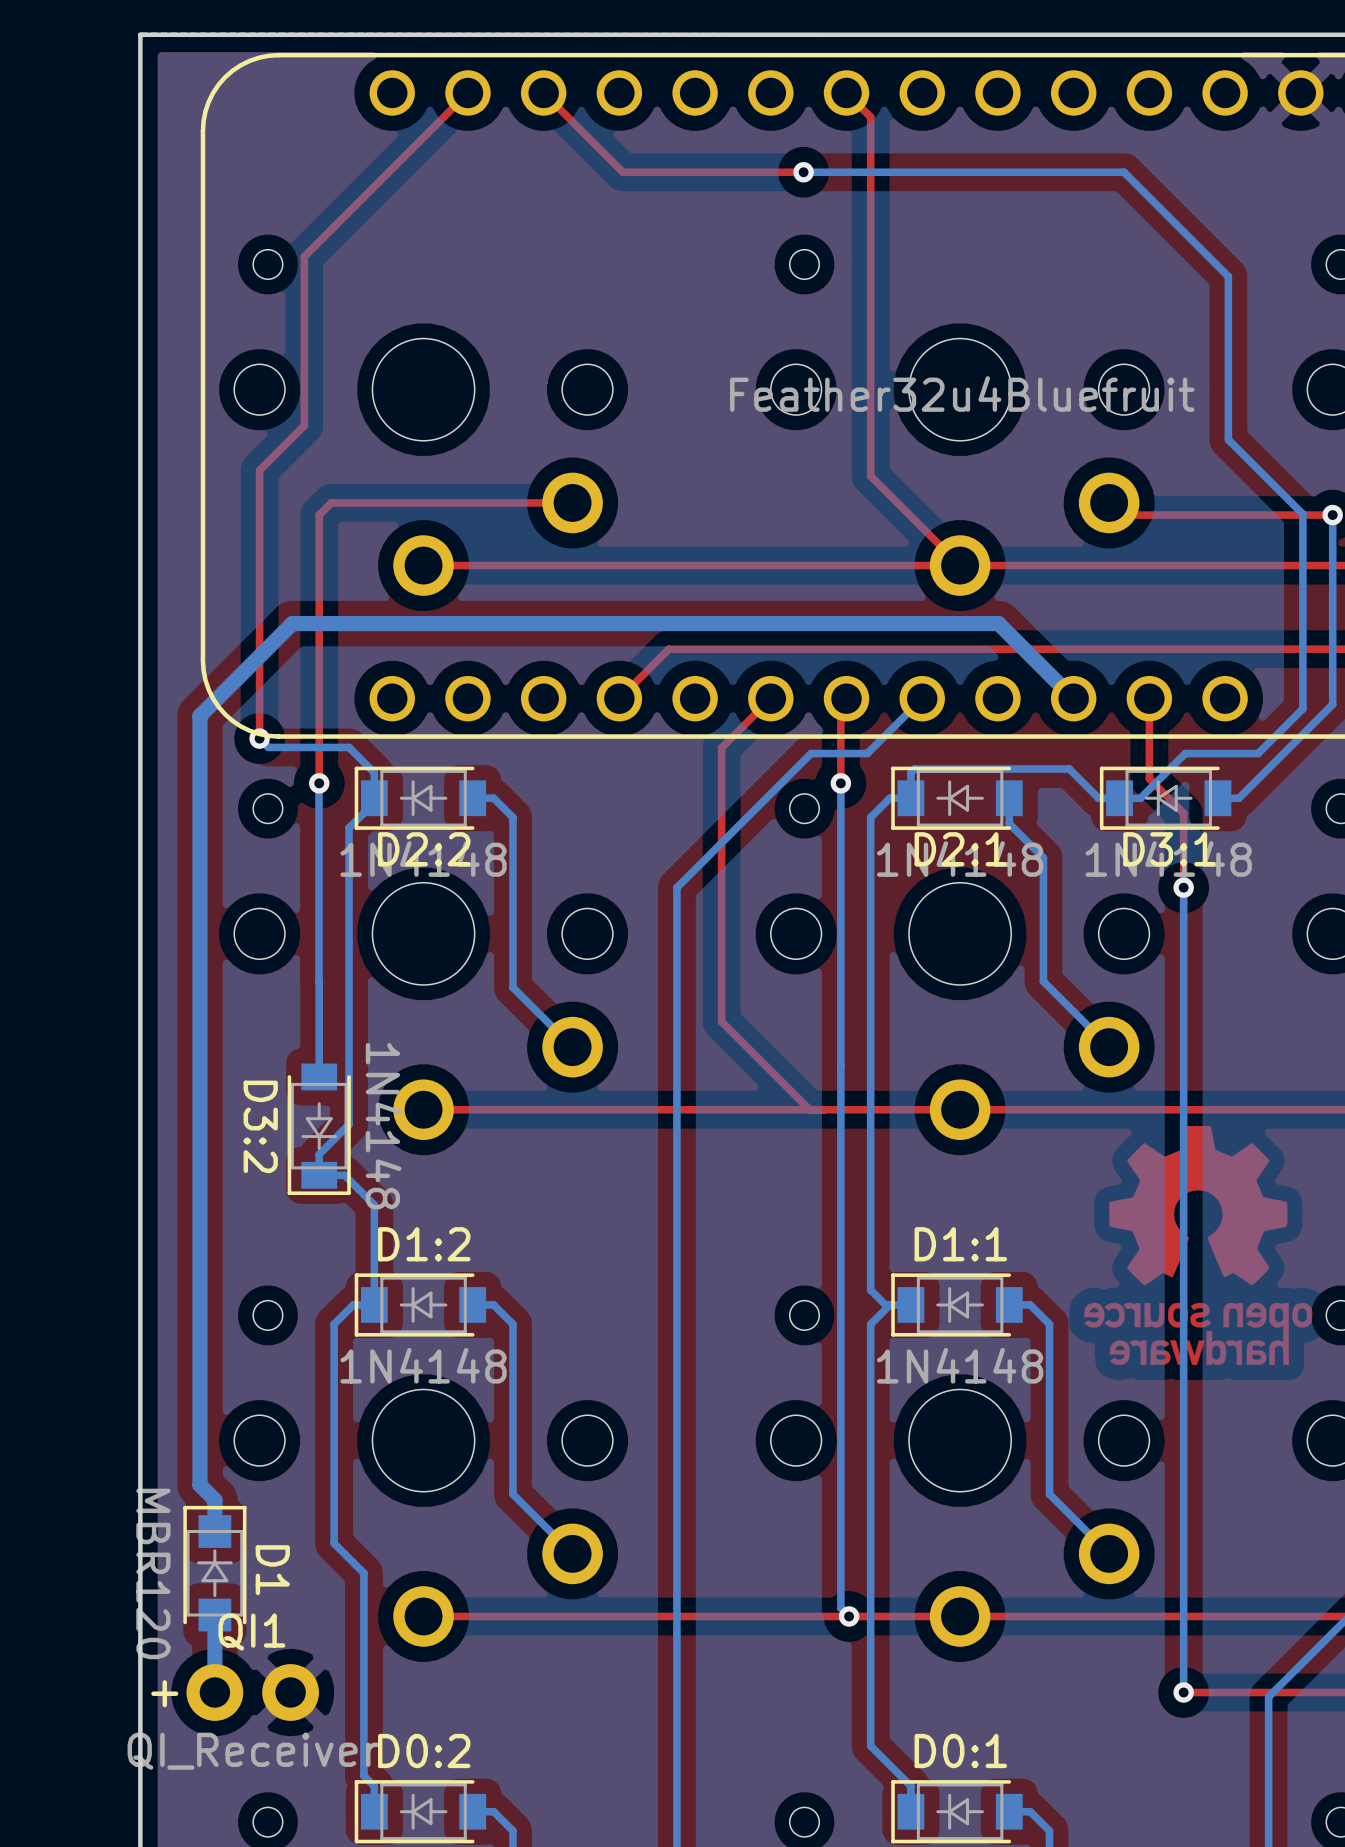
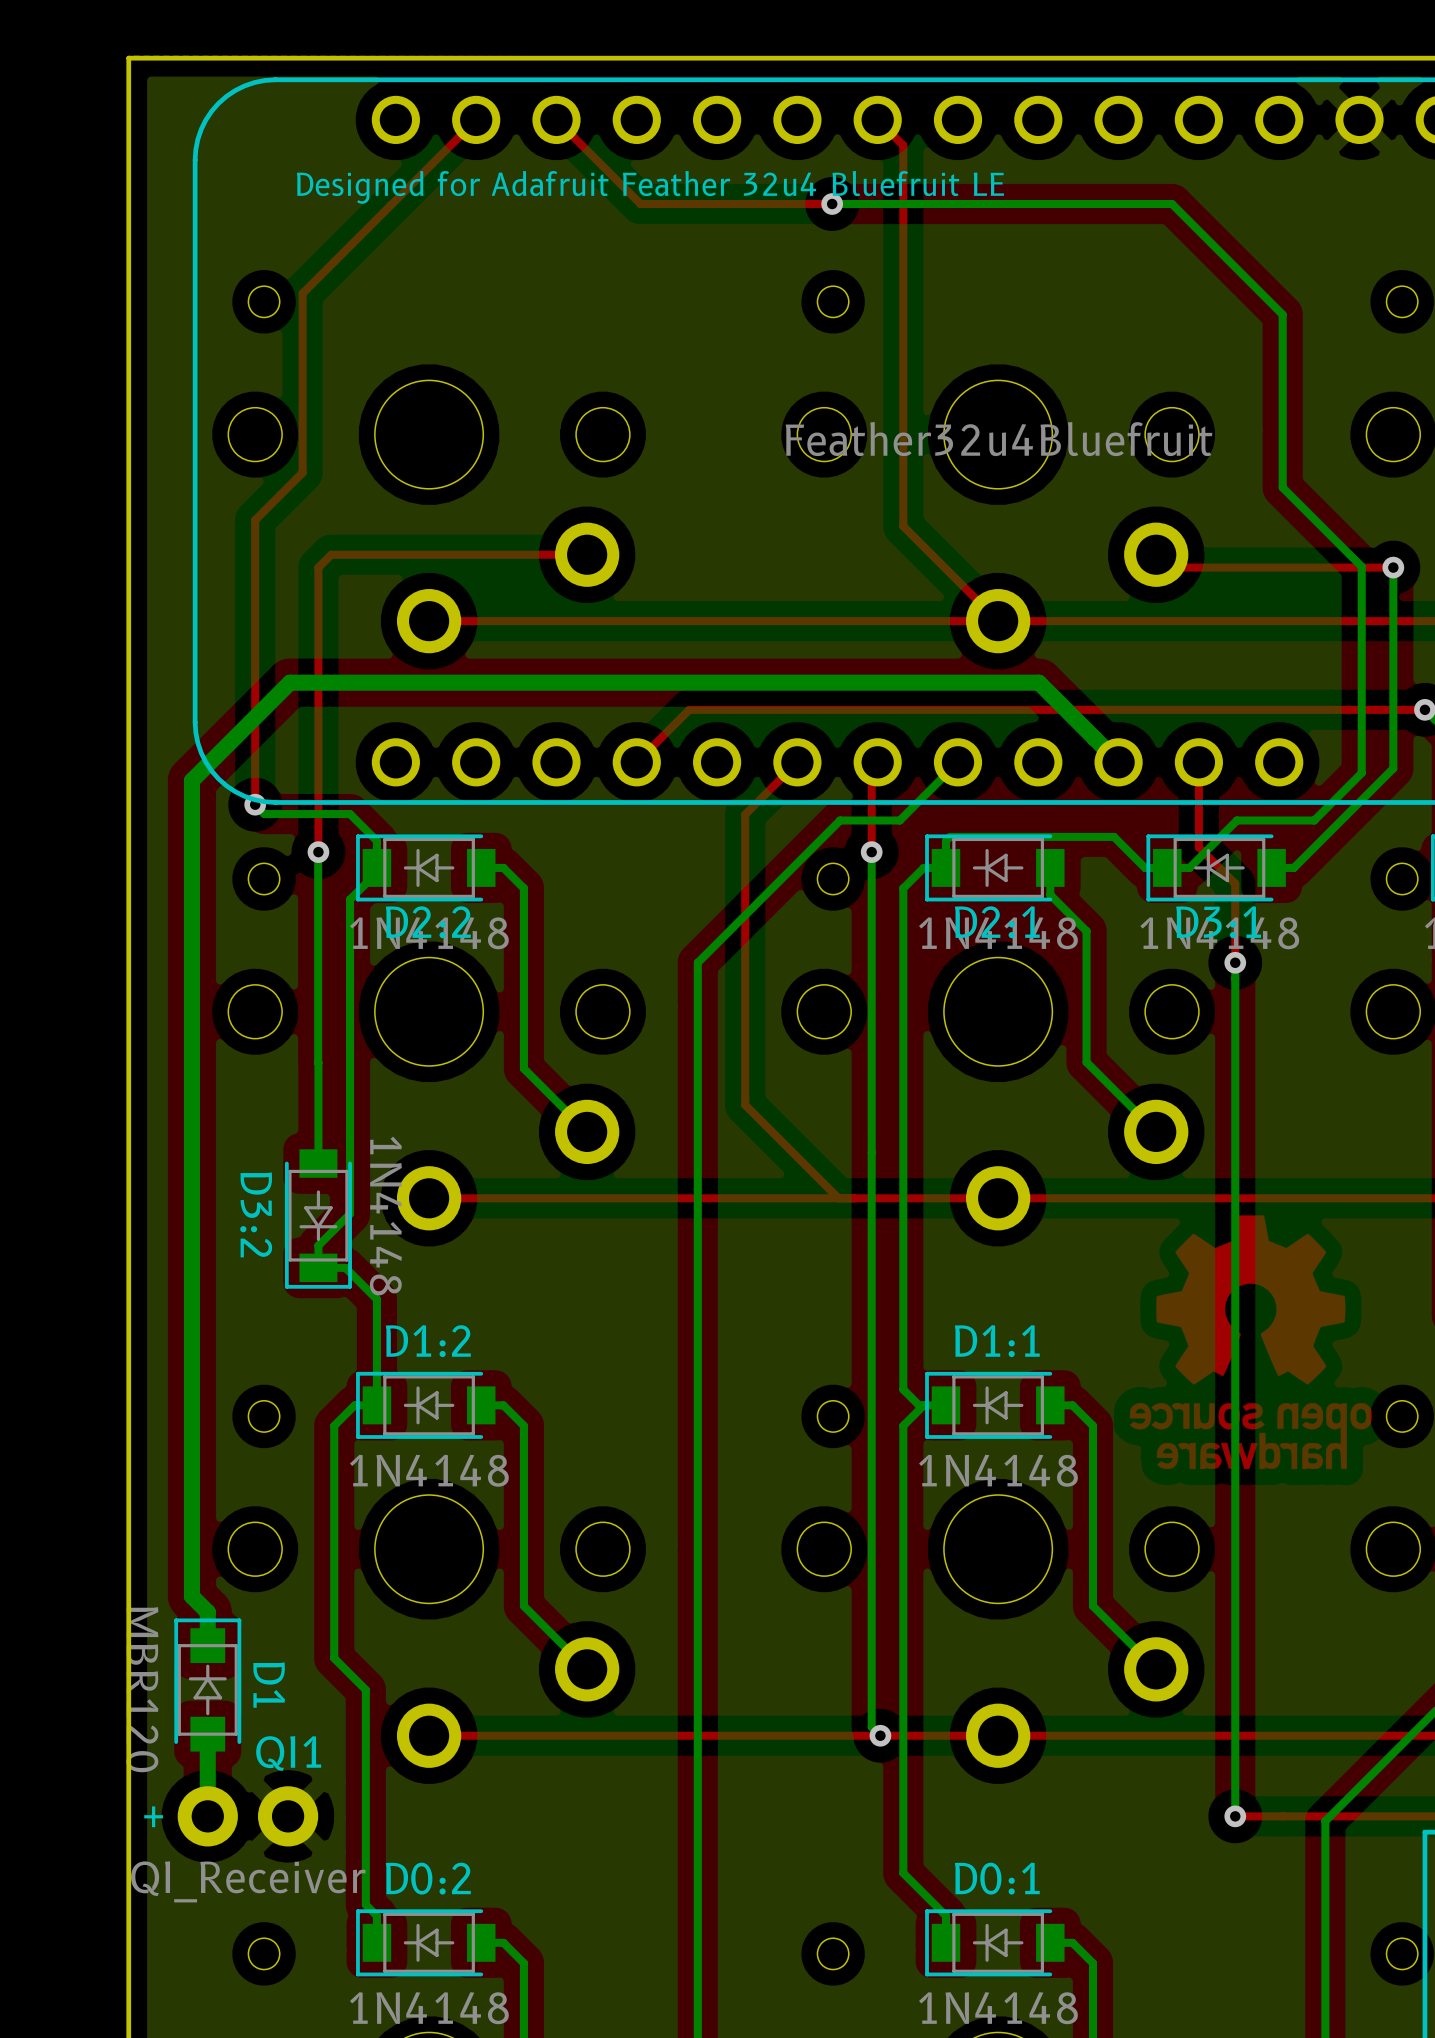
text: none -> Designed for Adafruit Feather 32u4 Bluefruit LE (650, 187)
QI1 name position: QI1 (251, 1631) -> QI1 (288, 1753)

